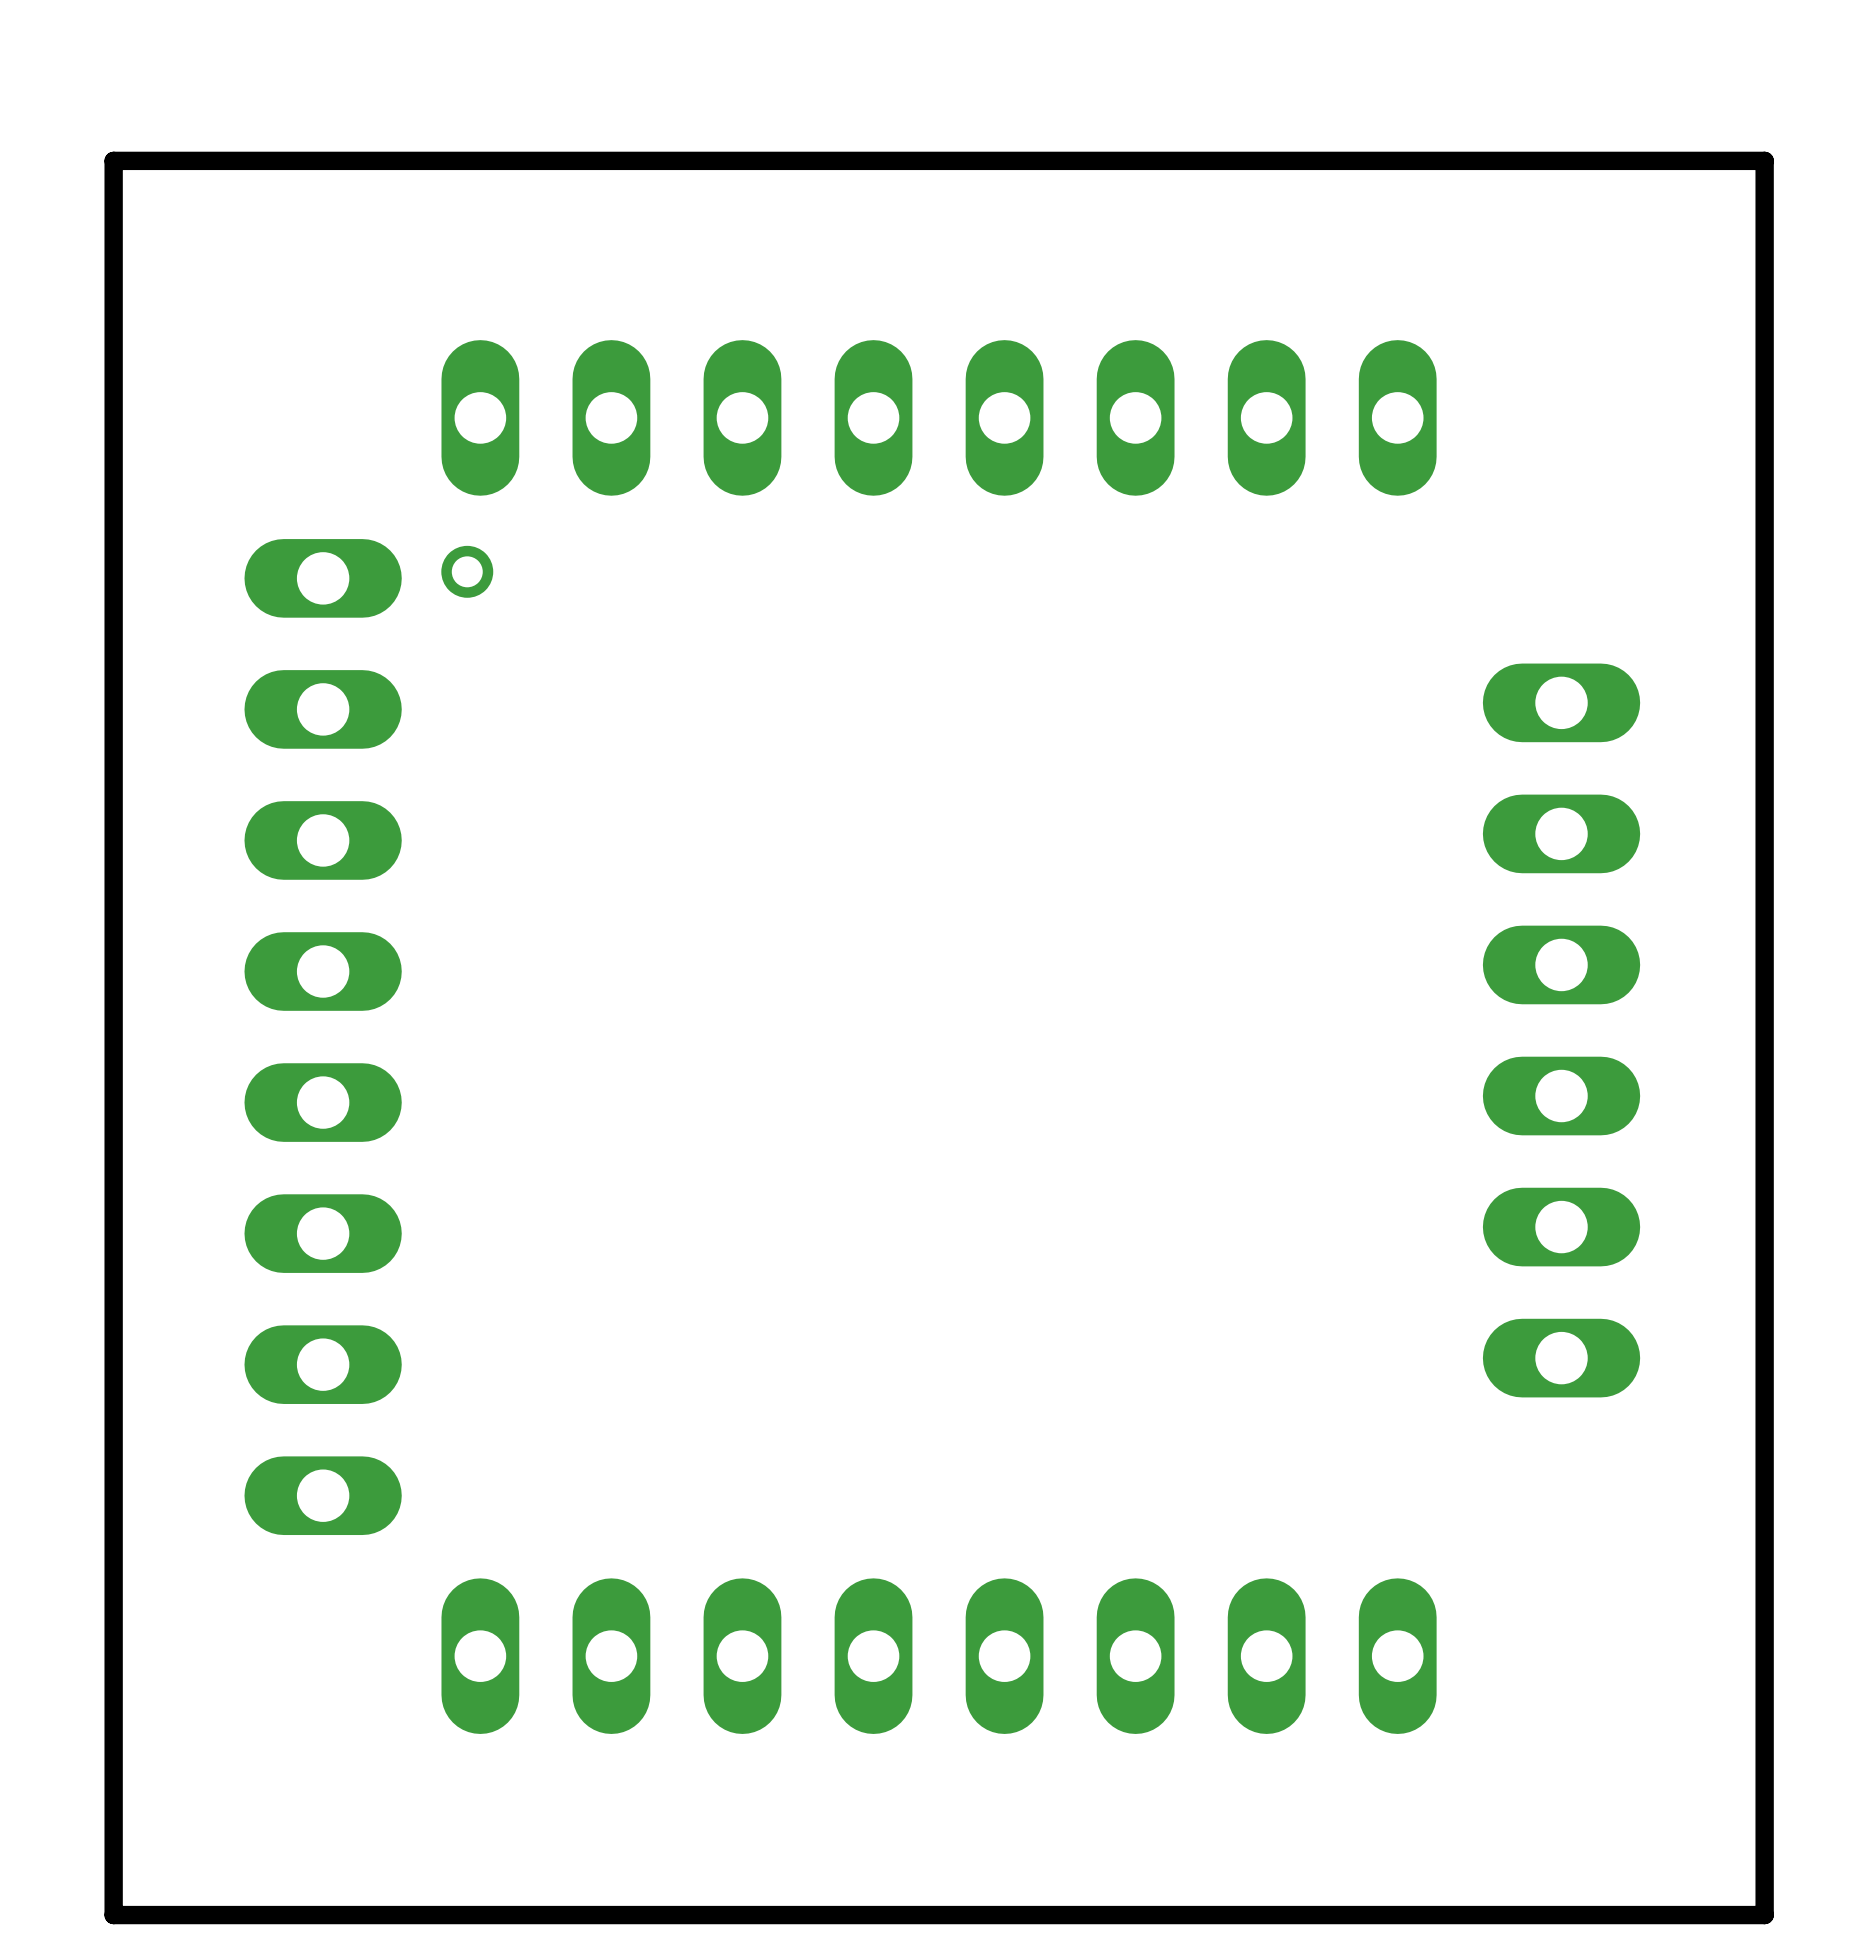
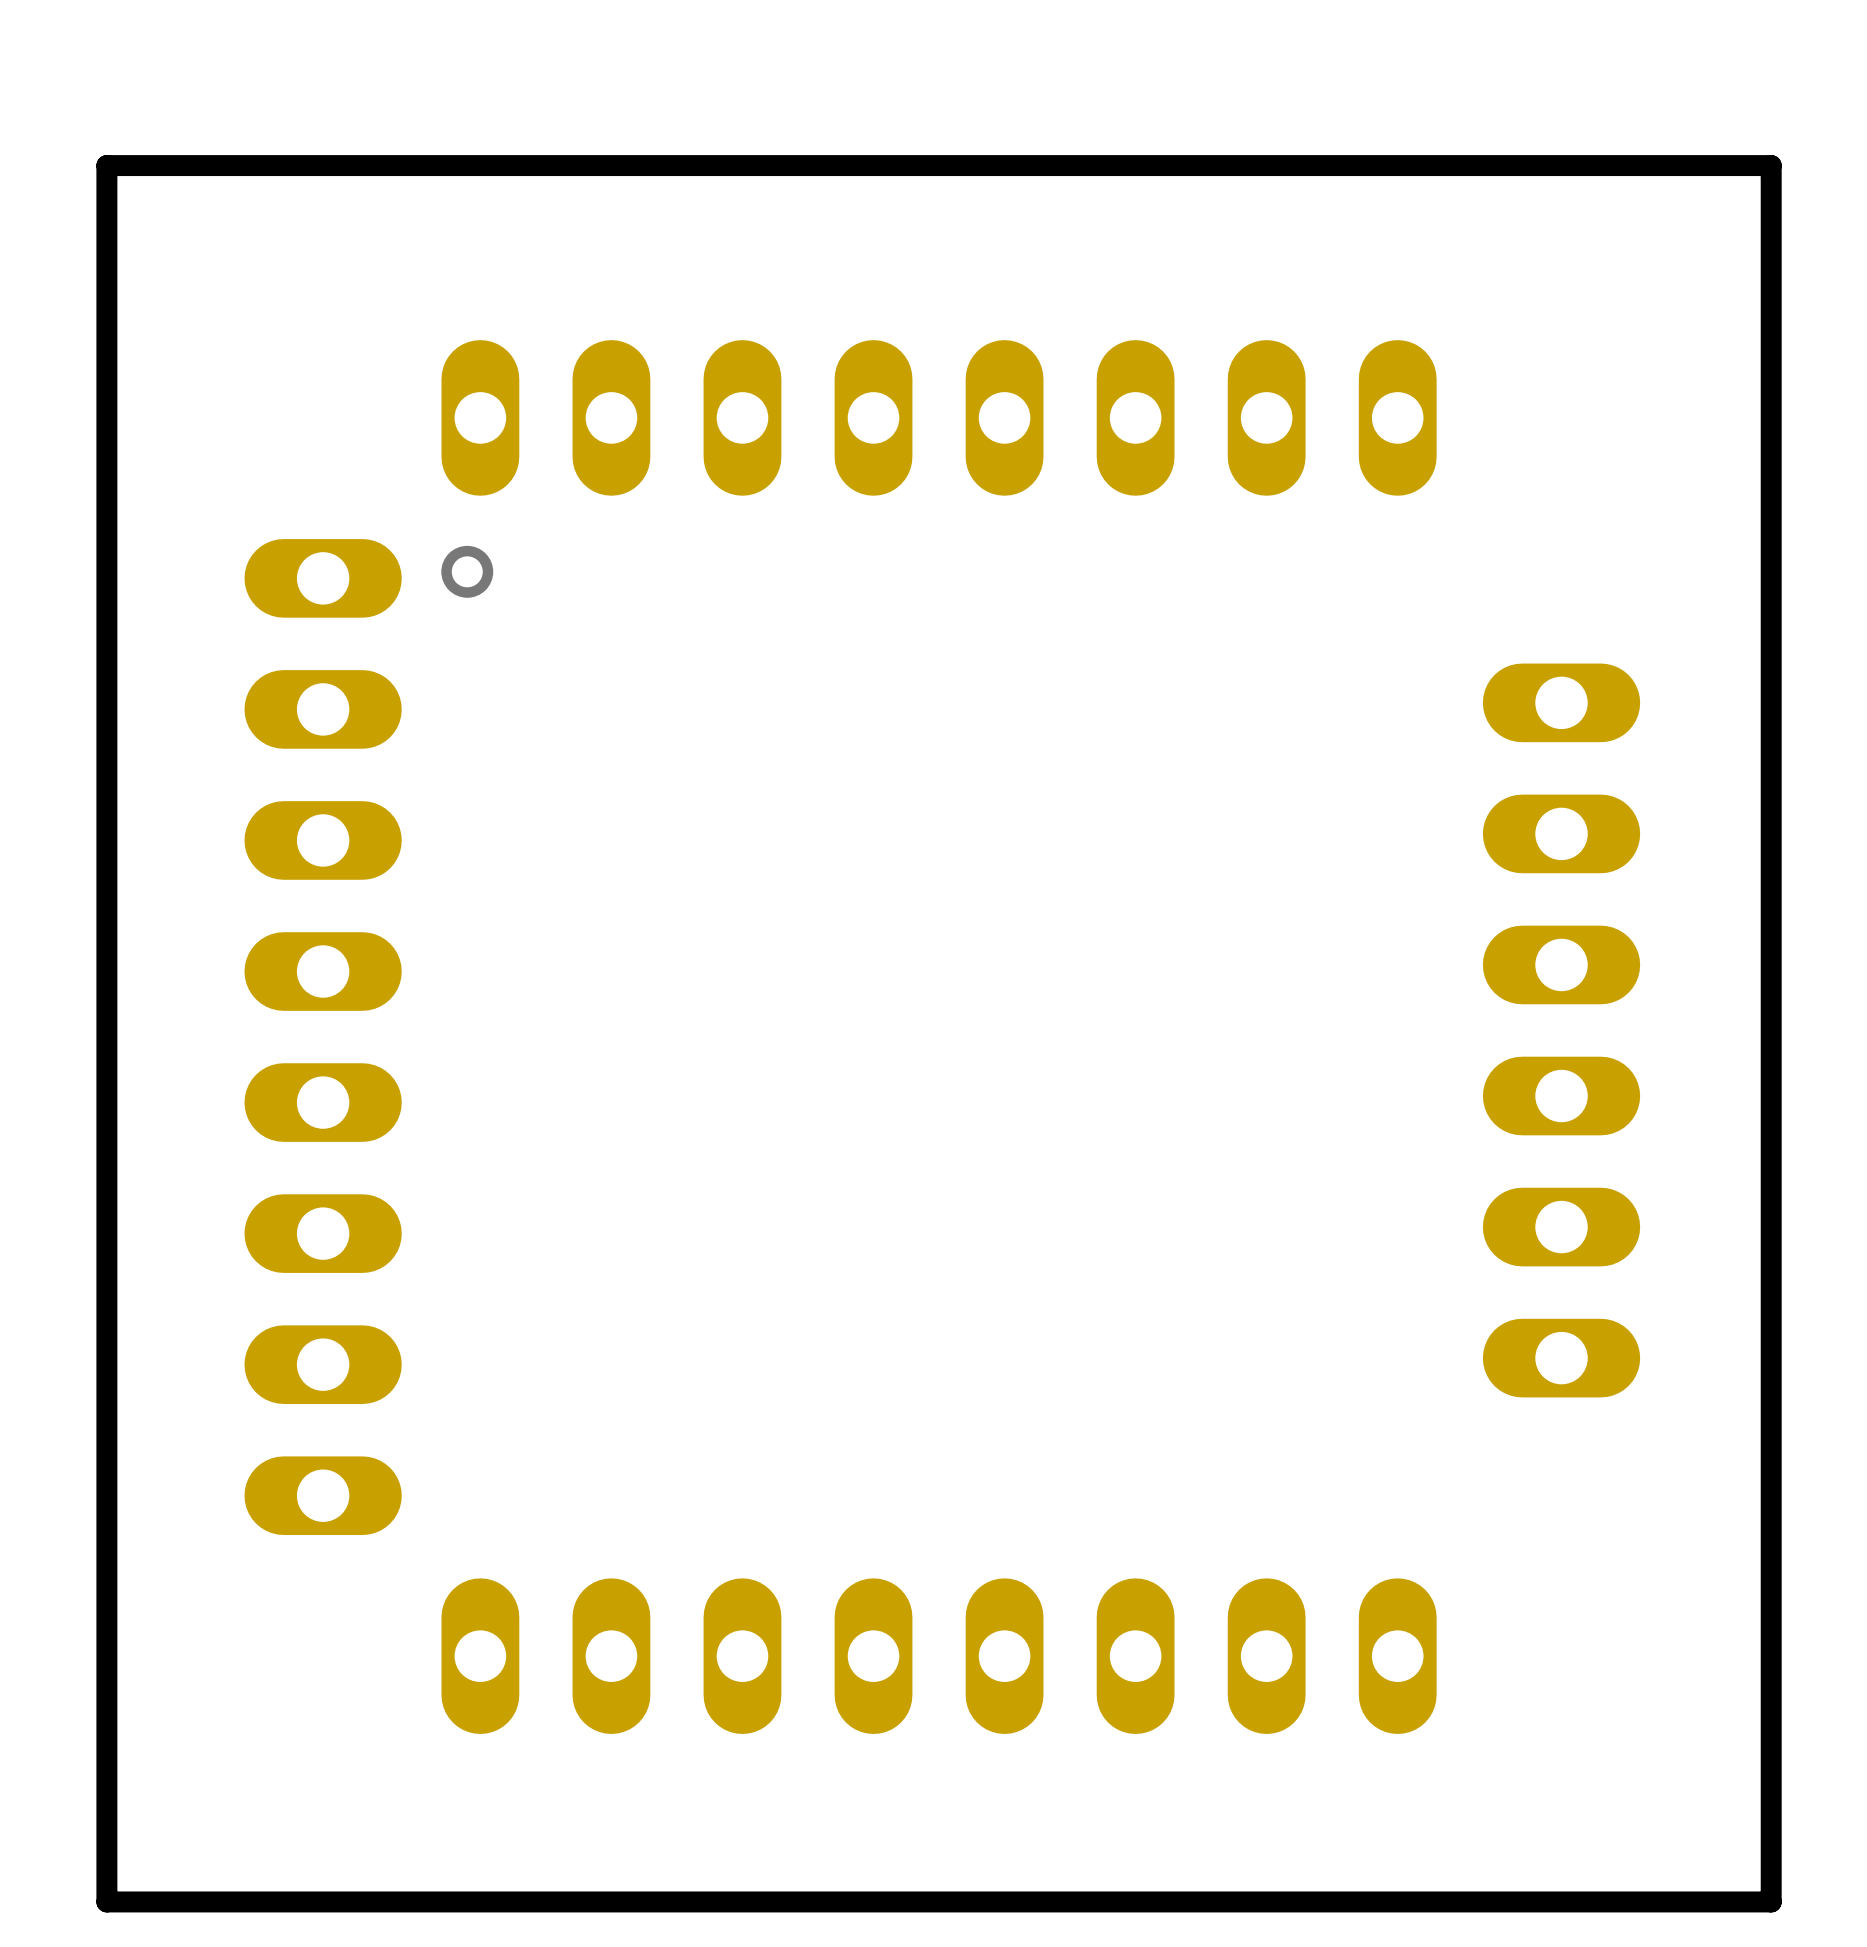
board edge: (1764, 160) (1764, 1915) (113, 1915) (113, 160) (1764, 160) -> (1771, 165) (1771, 1901) (106, 1901) (106, 165) (1771, 165)

